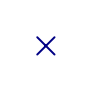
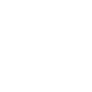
no-connect mark: (45, 45) -> none

